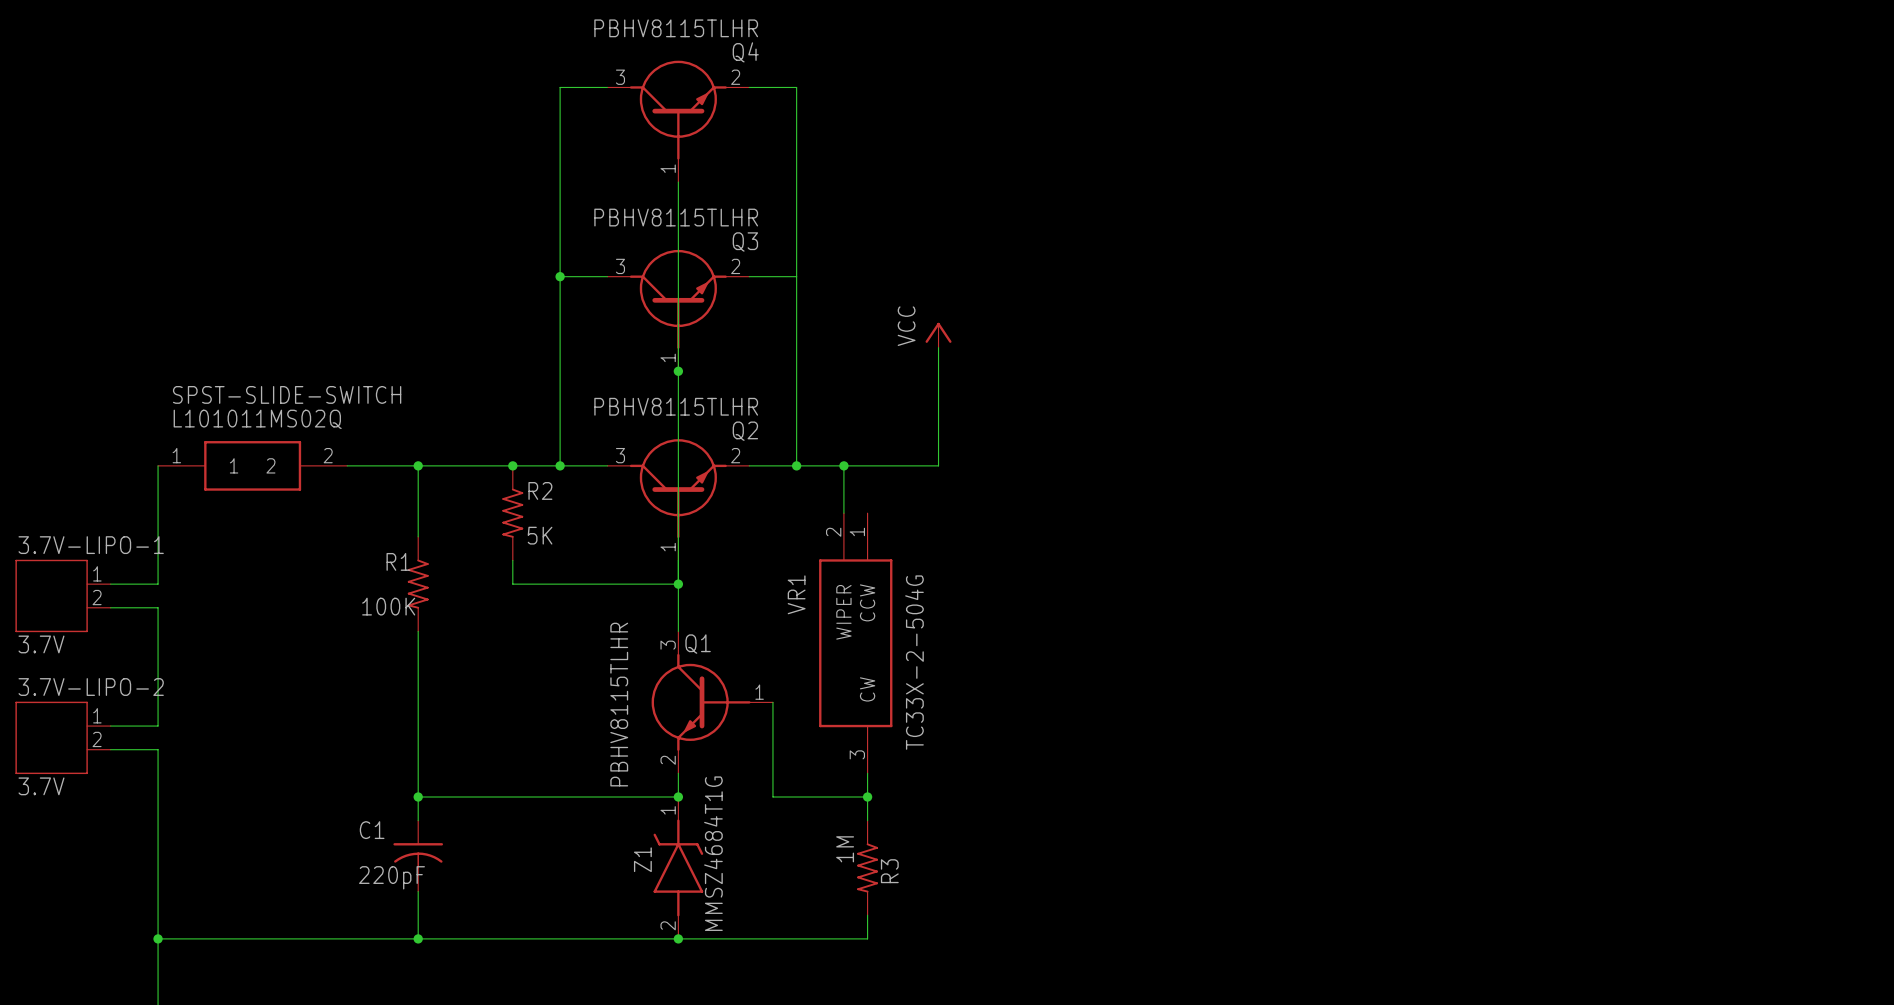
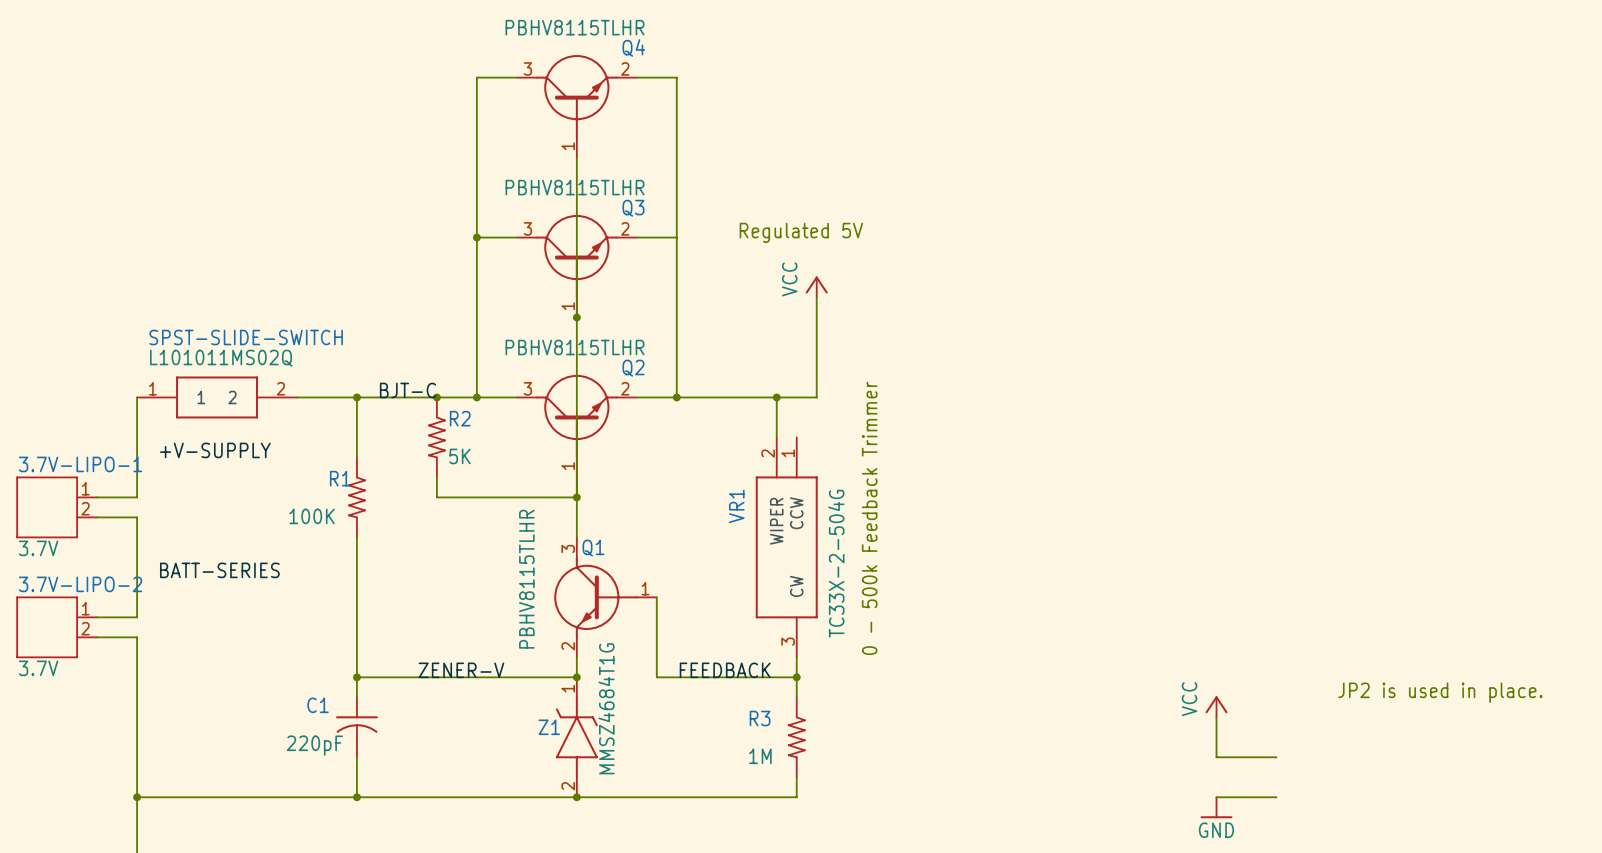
text: none -> Regulated 5V (801, 232)
power symbol position: VCC (938, 335) -> VCC (816, 287)
wire: (938, 347) (938, 465) -> (816, 297) (816, 397) (796, 397)
label: none -> BJT-C (407, 390)
wire: (843, 465) (843, 513) -> (776, 397) (776, 437)
junction: (843, 465) -> none
junction: none -> (776, 397)
label: none -> +V-SUPPLY (215, 450)
R1 value position: 100K (388, 606) -> 100K (312, 516)
text: none -> 0 - 500k Feedback Trimmer (869, 518)
VR1 position: (855, 643) -> (786, 547)
label: none -> BATT-SERIES (219, 570)
Q1 value position: PBHV8115TLHR (619, 704) -> PBHV8115TLHR (526, 579)
wire: (867, 773) (867, 820) -> (796, 657) (796, 697)
label: none -> ZENER-V (461, 670)
label: none -> FEEDBACK (725, 670)
wire: none -> (736, 677) (796, 677)
junction: (867, 796) -> none
junction: none -> (796, 677)
text: none -> JP2 is used in place. (1440, 692)
power symbol: none -> VCC (1216, 706)
wire: none -> (1216, 717) (1216, 757) (1276, 757)
R3 value rotation: 0° (845, 849) -> 90° clockwise (760, 756)
R3 value position: 1M (845, 849) -> 1M (760, 756)
Z1 value position: MMSZ4684T1G (713, 853) -> MMSZ4684T1G (606, 708)
Z1 name rotation: 0° (642, 859) -> 90° clockwise (549, 727)
R3 position: (867, 867) -> (796, 737)
R3 name rotation: 0° (889, 871) -> 90° clockwise (760, 718)
C1 value position: 220pF (392, 877) -> 220pF (314, 745)
wire: (867, 915) (867, 938) -> (796, 777) (796, 797) (736, 797)
wire: none -> (1216, 797) (1276, 797)
power symbol: none -> GND (1216, 807)

